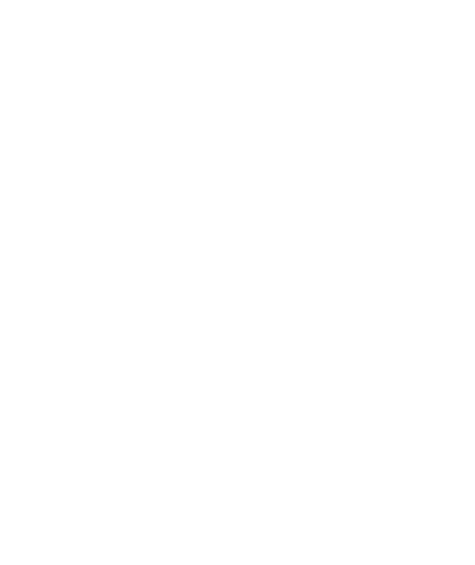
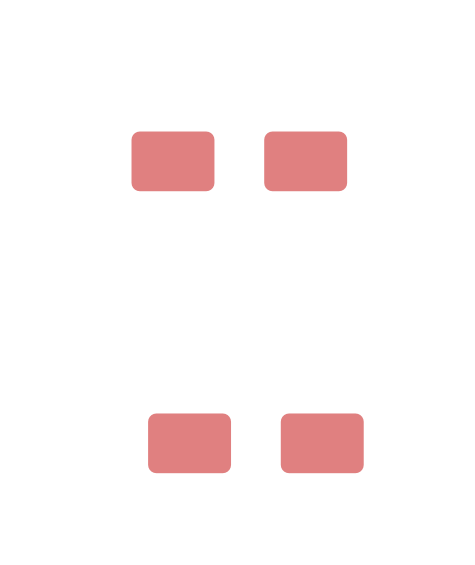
part: none -> (239, 161)
part: none -> (255, 443)

